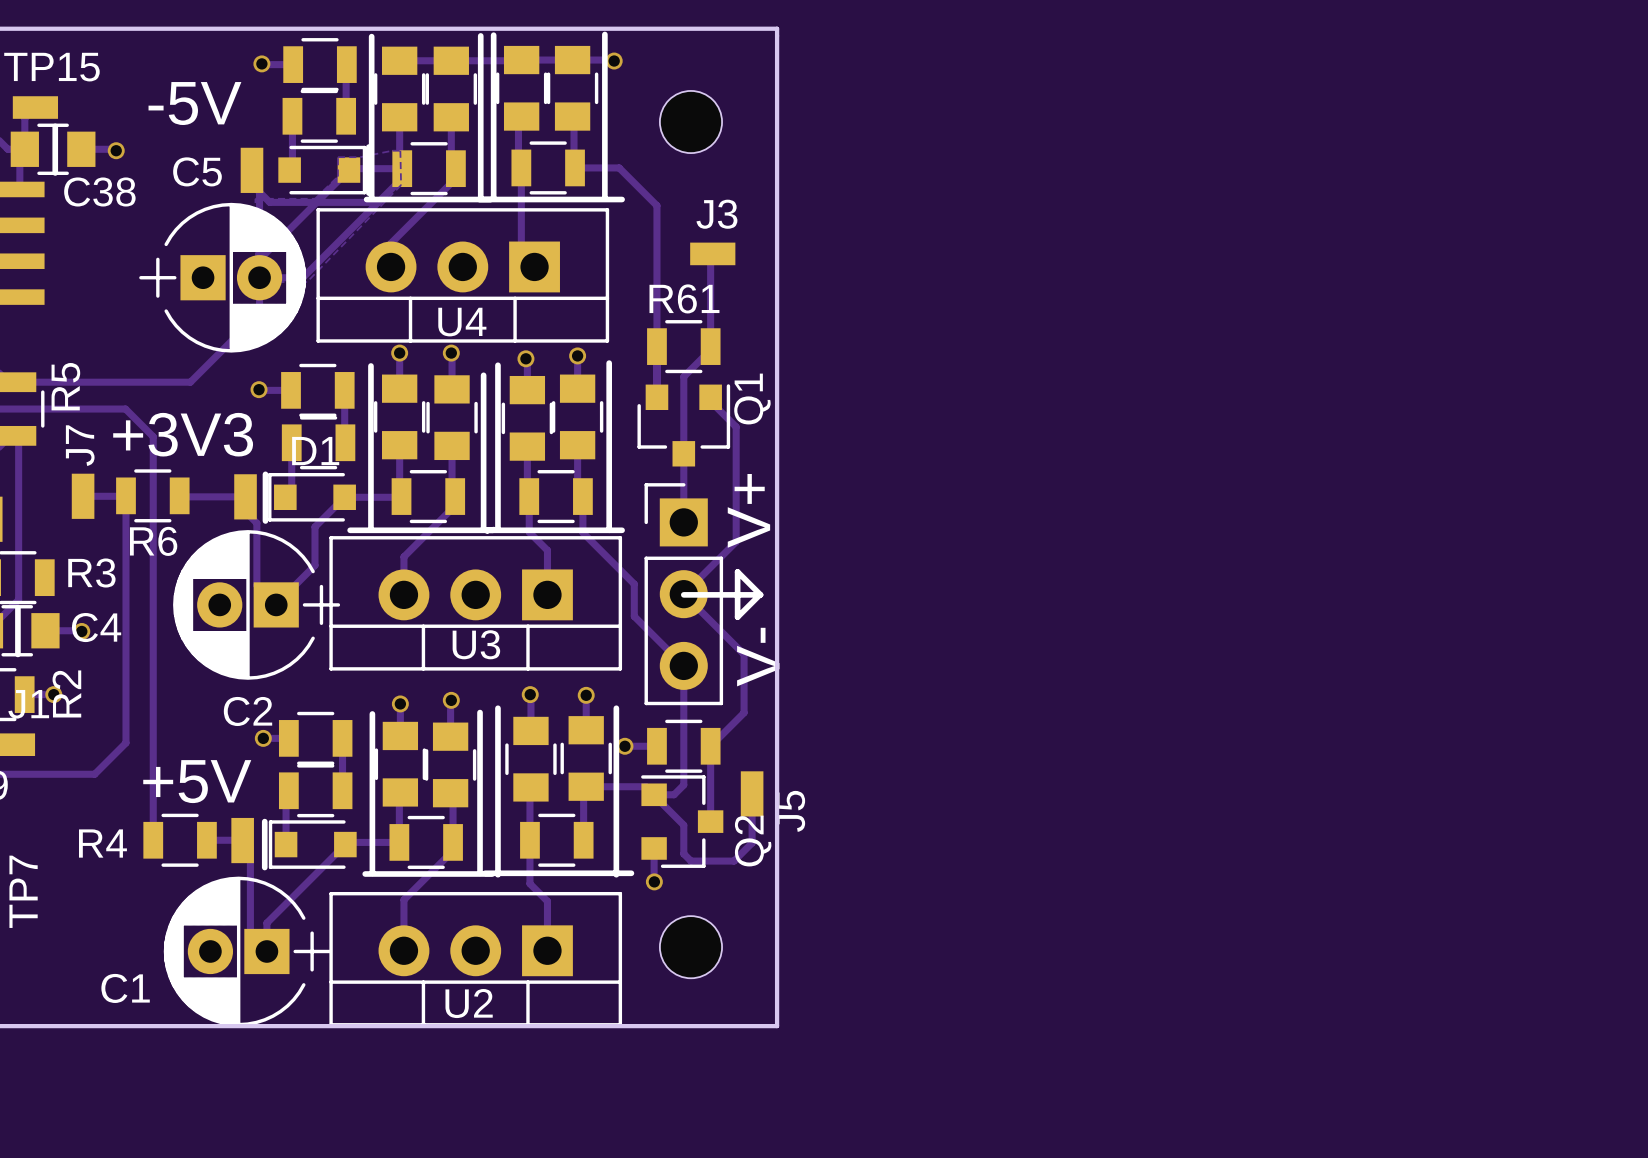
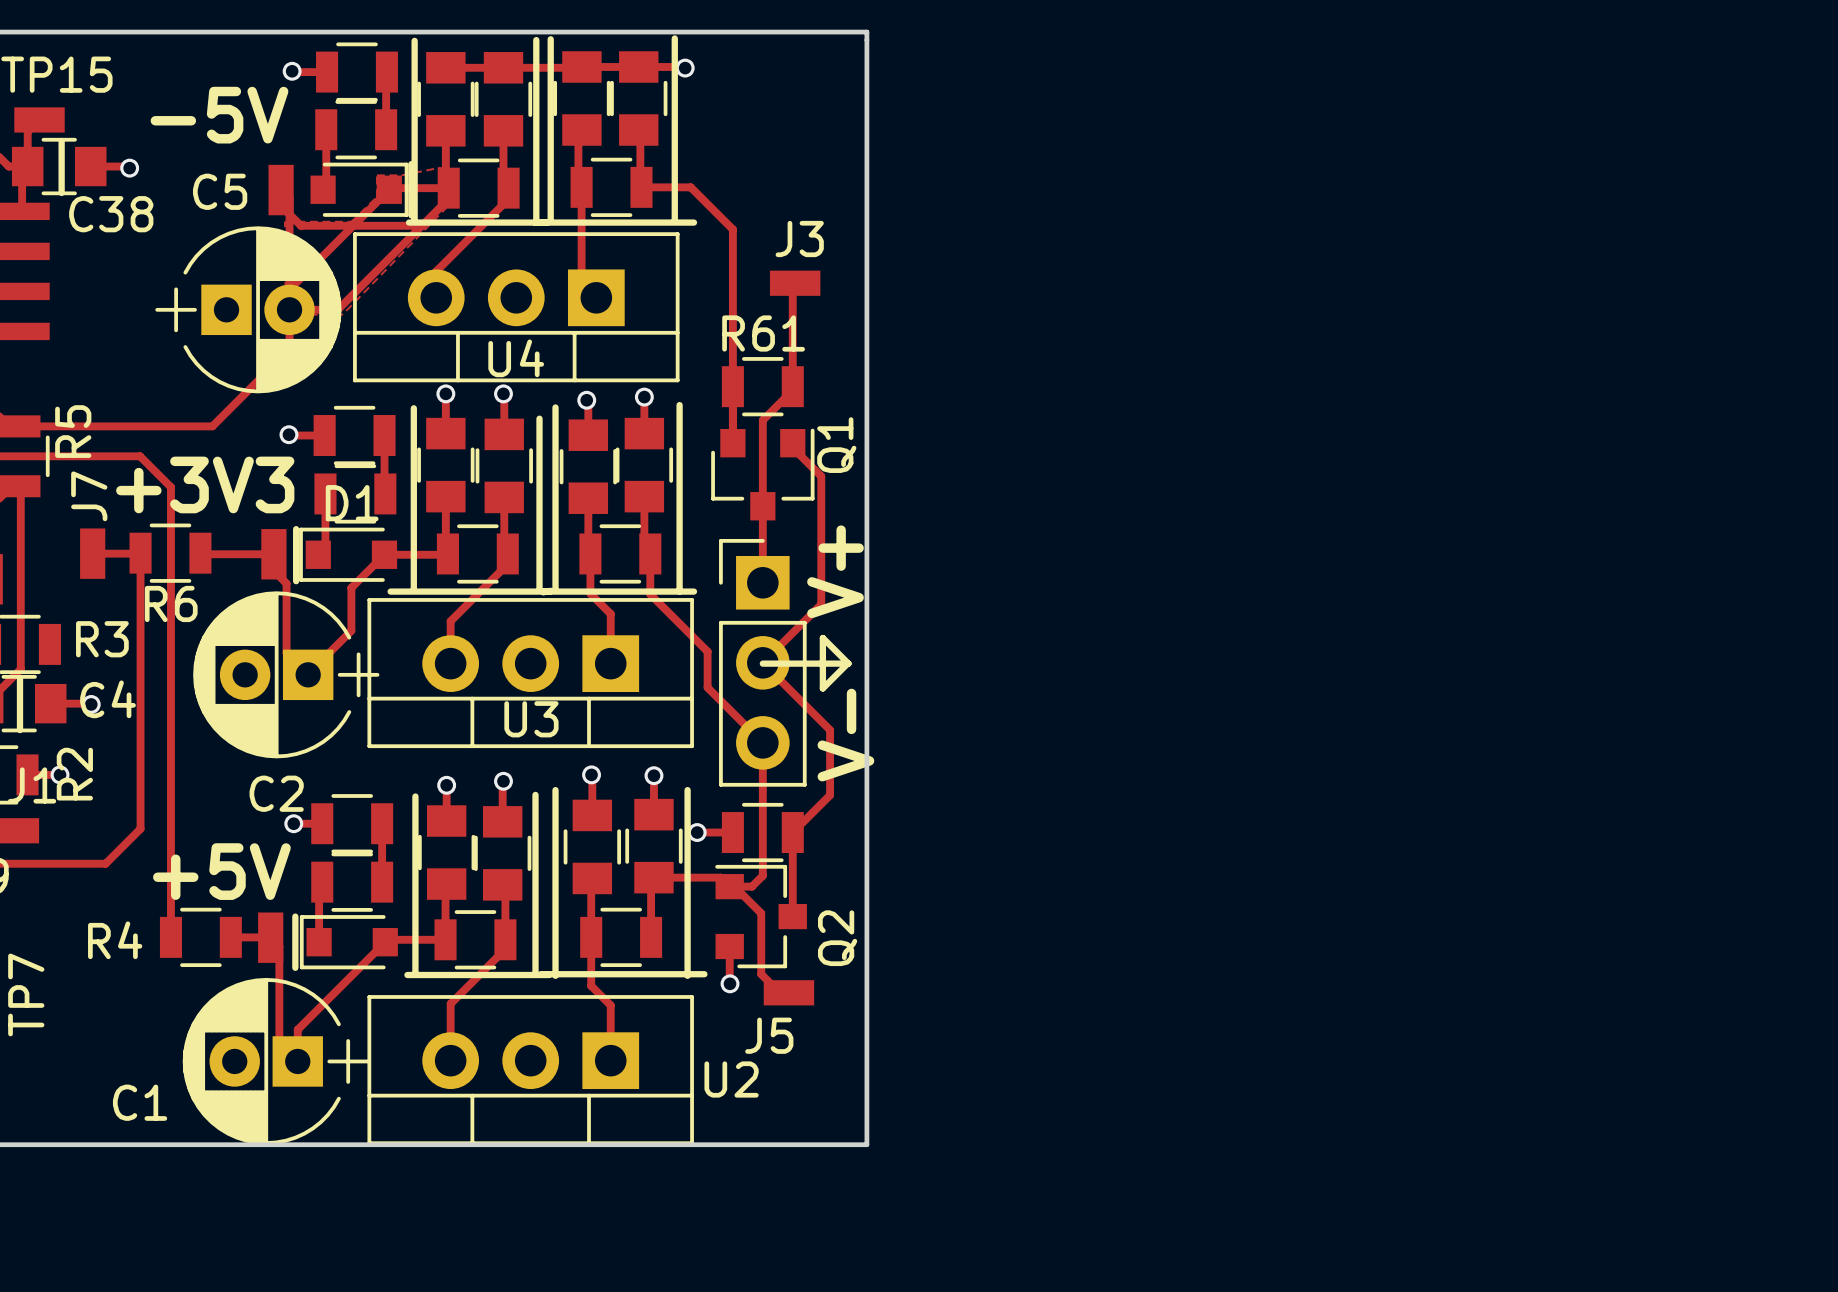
part: (690, 122) -> none
track: (752, 793) (752, 843) (734, 861) (690, 861) (683, 853) (683, 825) (654, 794) -> none
J5 rotation: 0° (752, 793) -> 90° clockwise (788, 992)
J5 position: (752, 793) -> (788, 992)
track: none -> (734, 886) (761, 913) (761, 974) (779, 992) (788, 992)
part: (690, 947) -> none
U2 name position: U2 (469, 1003) -> U2 (731, 1079)

